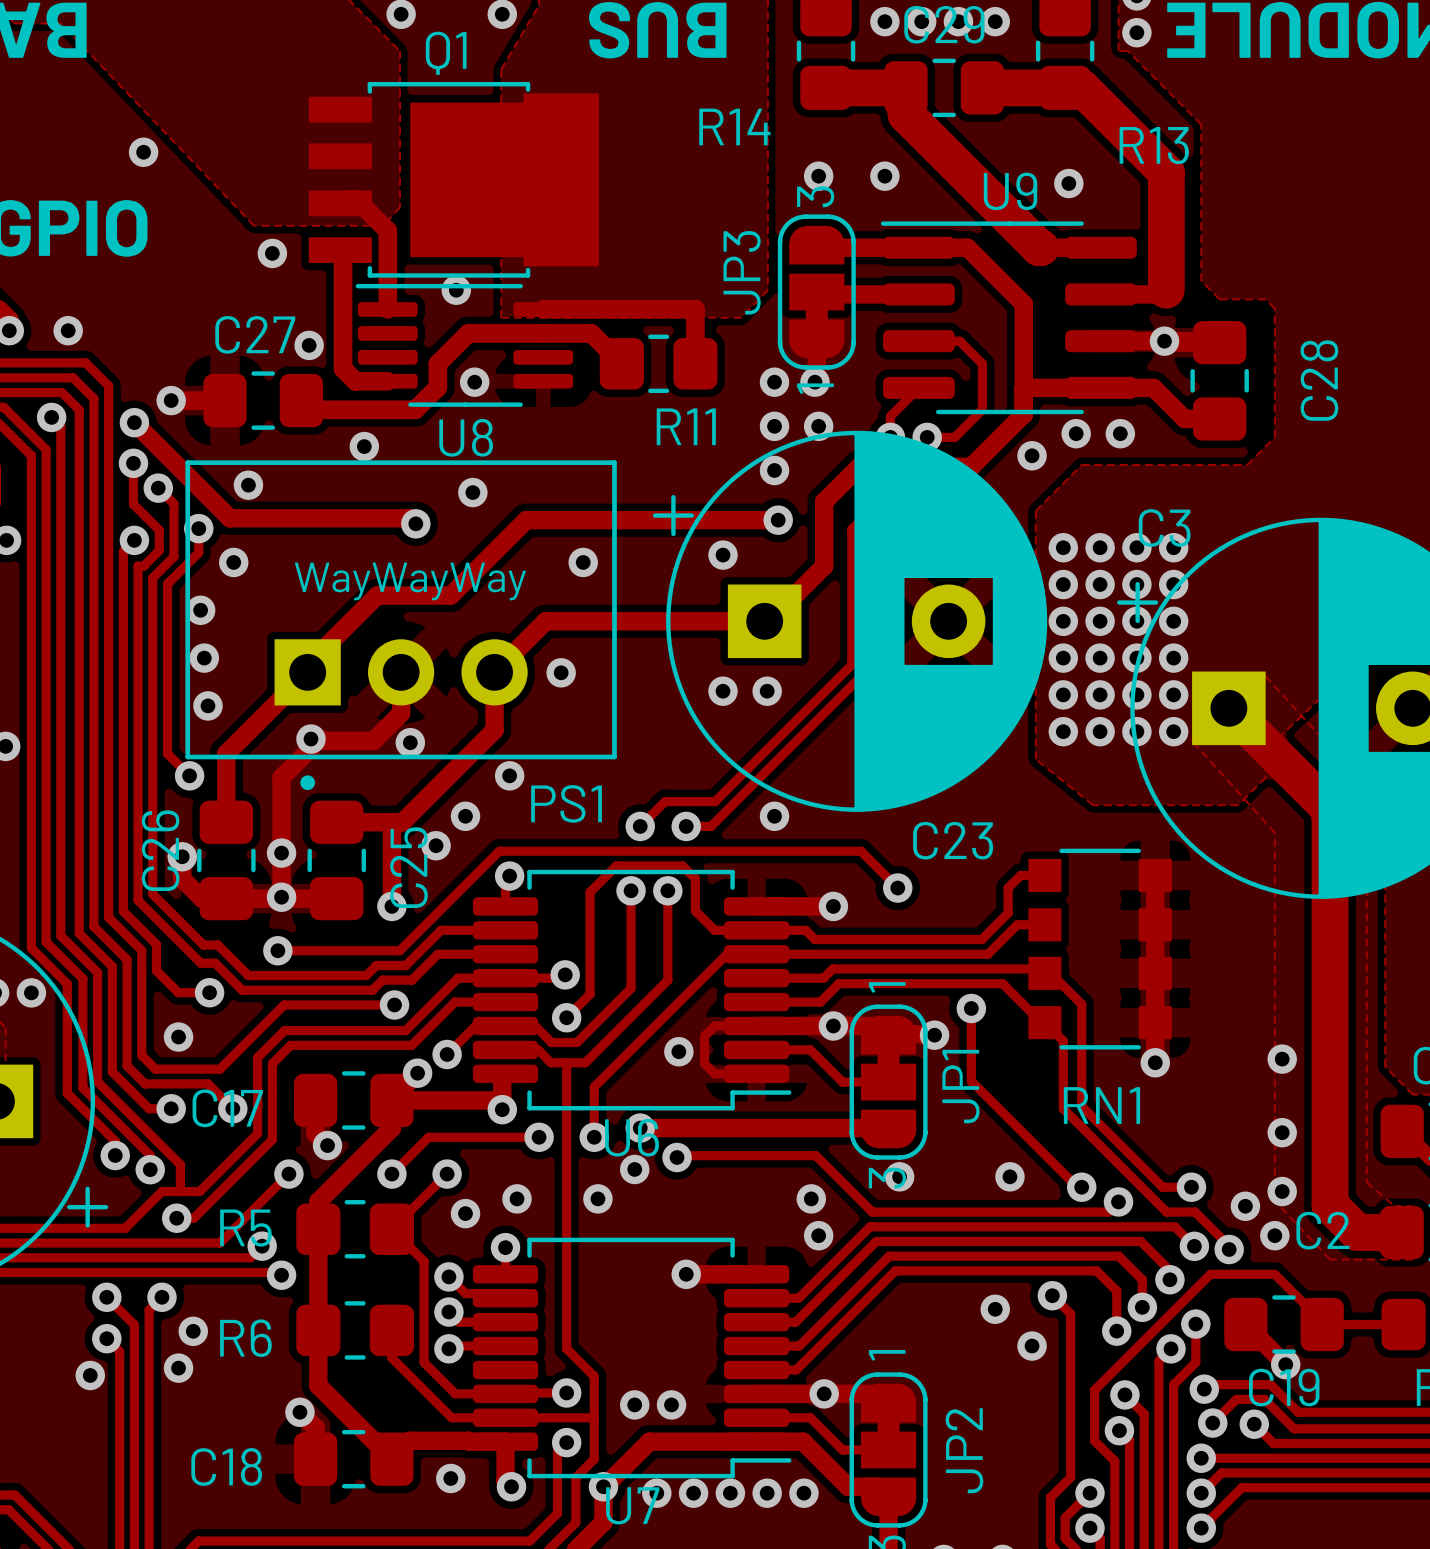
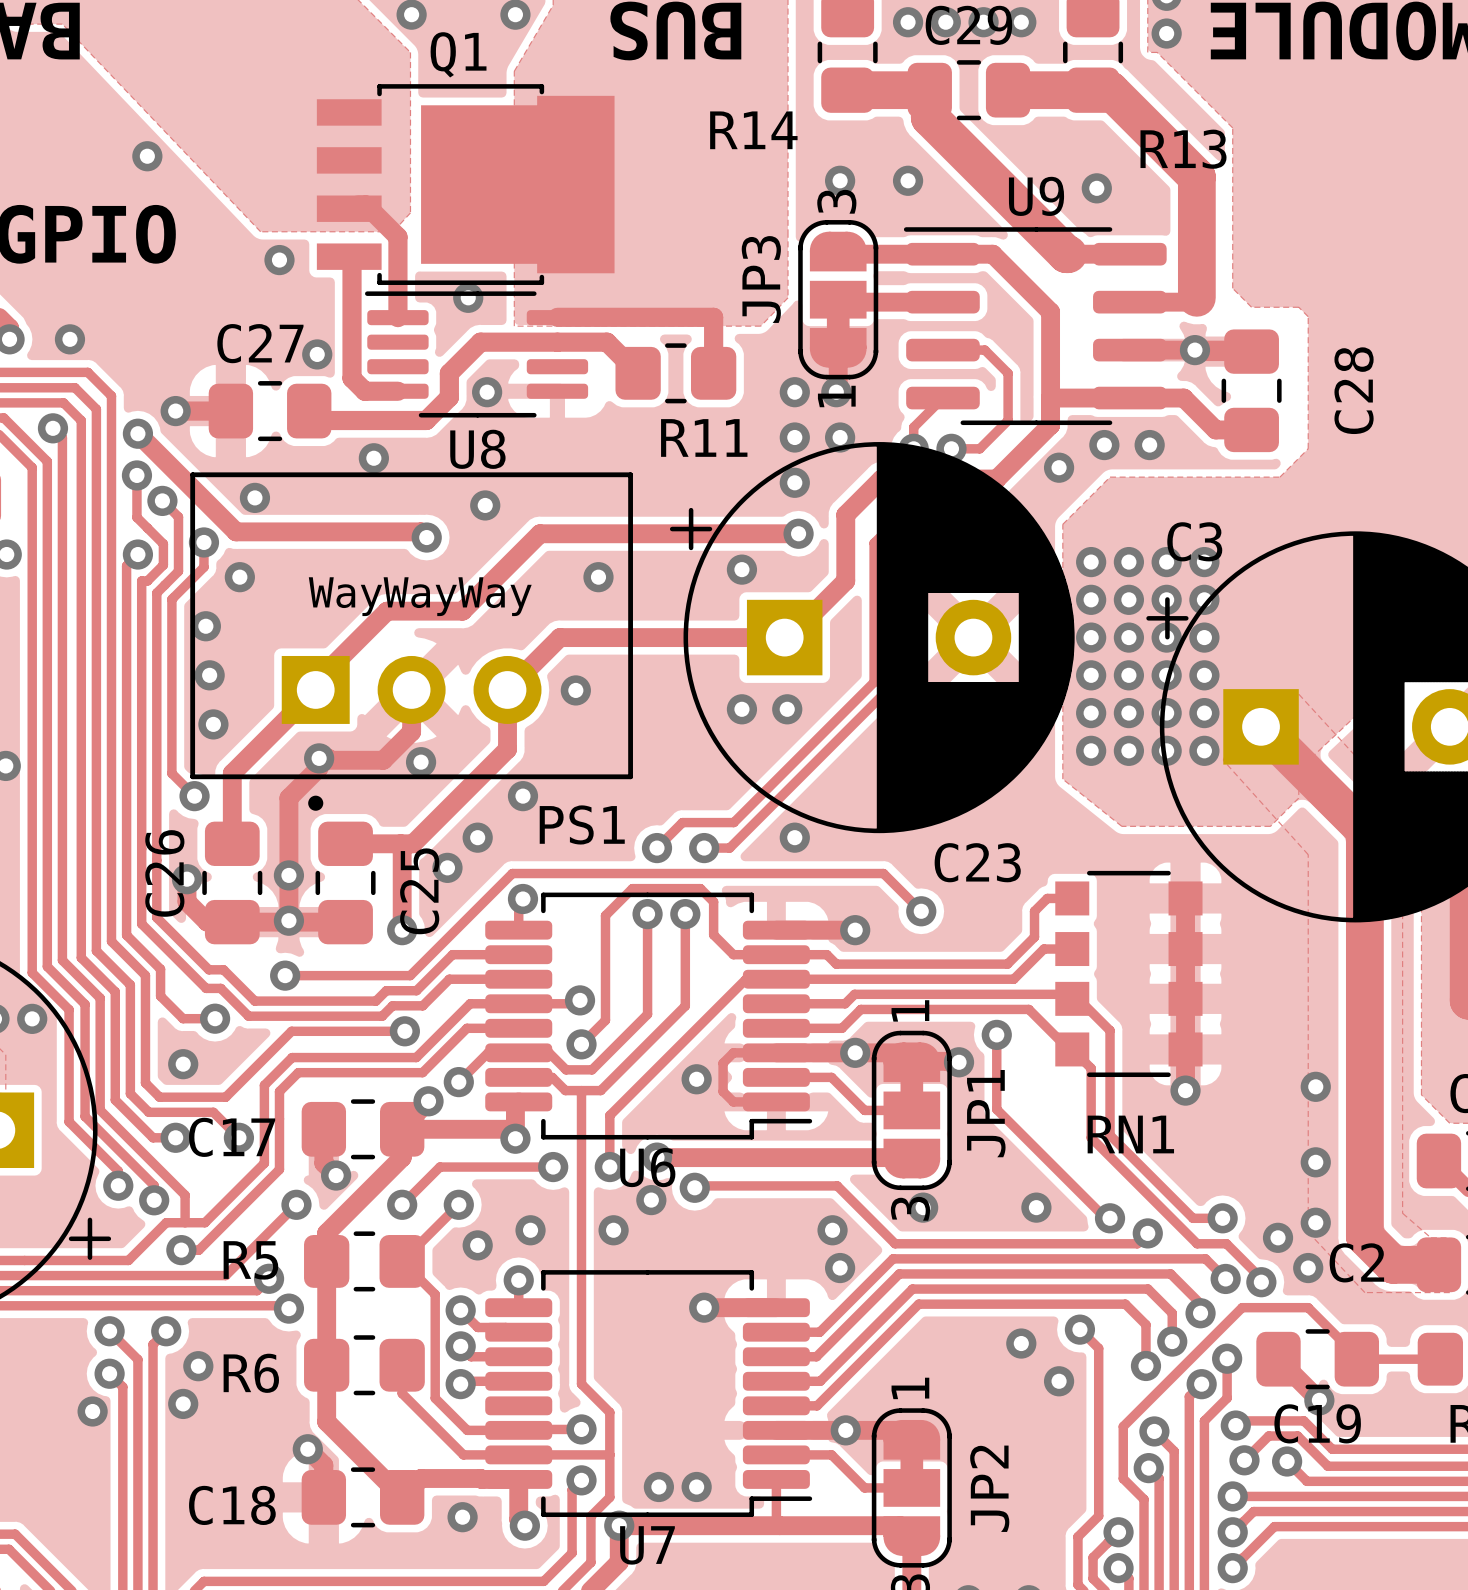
via: (634, 1404) -> none
via: (671, 1404) -> none
track: none -> (776, 1479) (776, 1522) (779, 1525)
via: none -> (658, 1486)
via: none -> (696, 1486)
track: (604, 1486) (649, 1441) (803, 1441) (848, 1486) -> (620, 1525) (870, 1525)
via: (656, 1493) -> none
via: (693, 1493) -> none
via: (730, 1493) -> none
via: (767, 1493) -> none
via: (803, 1493) -> none

